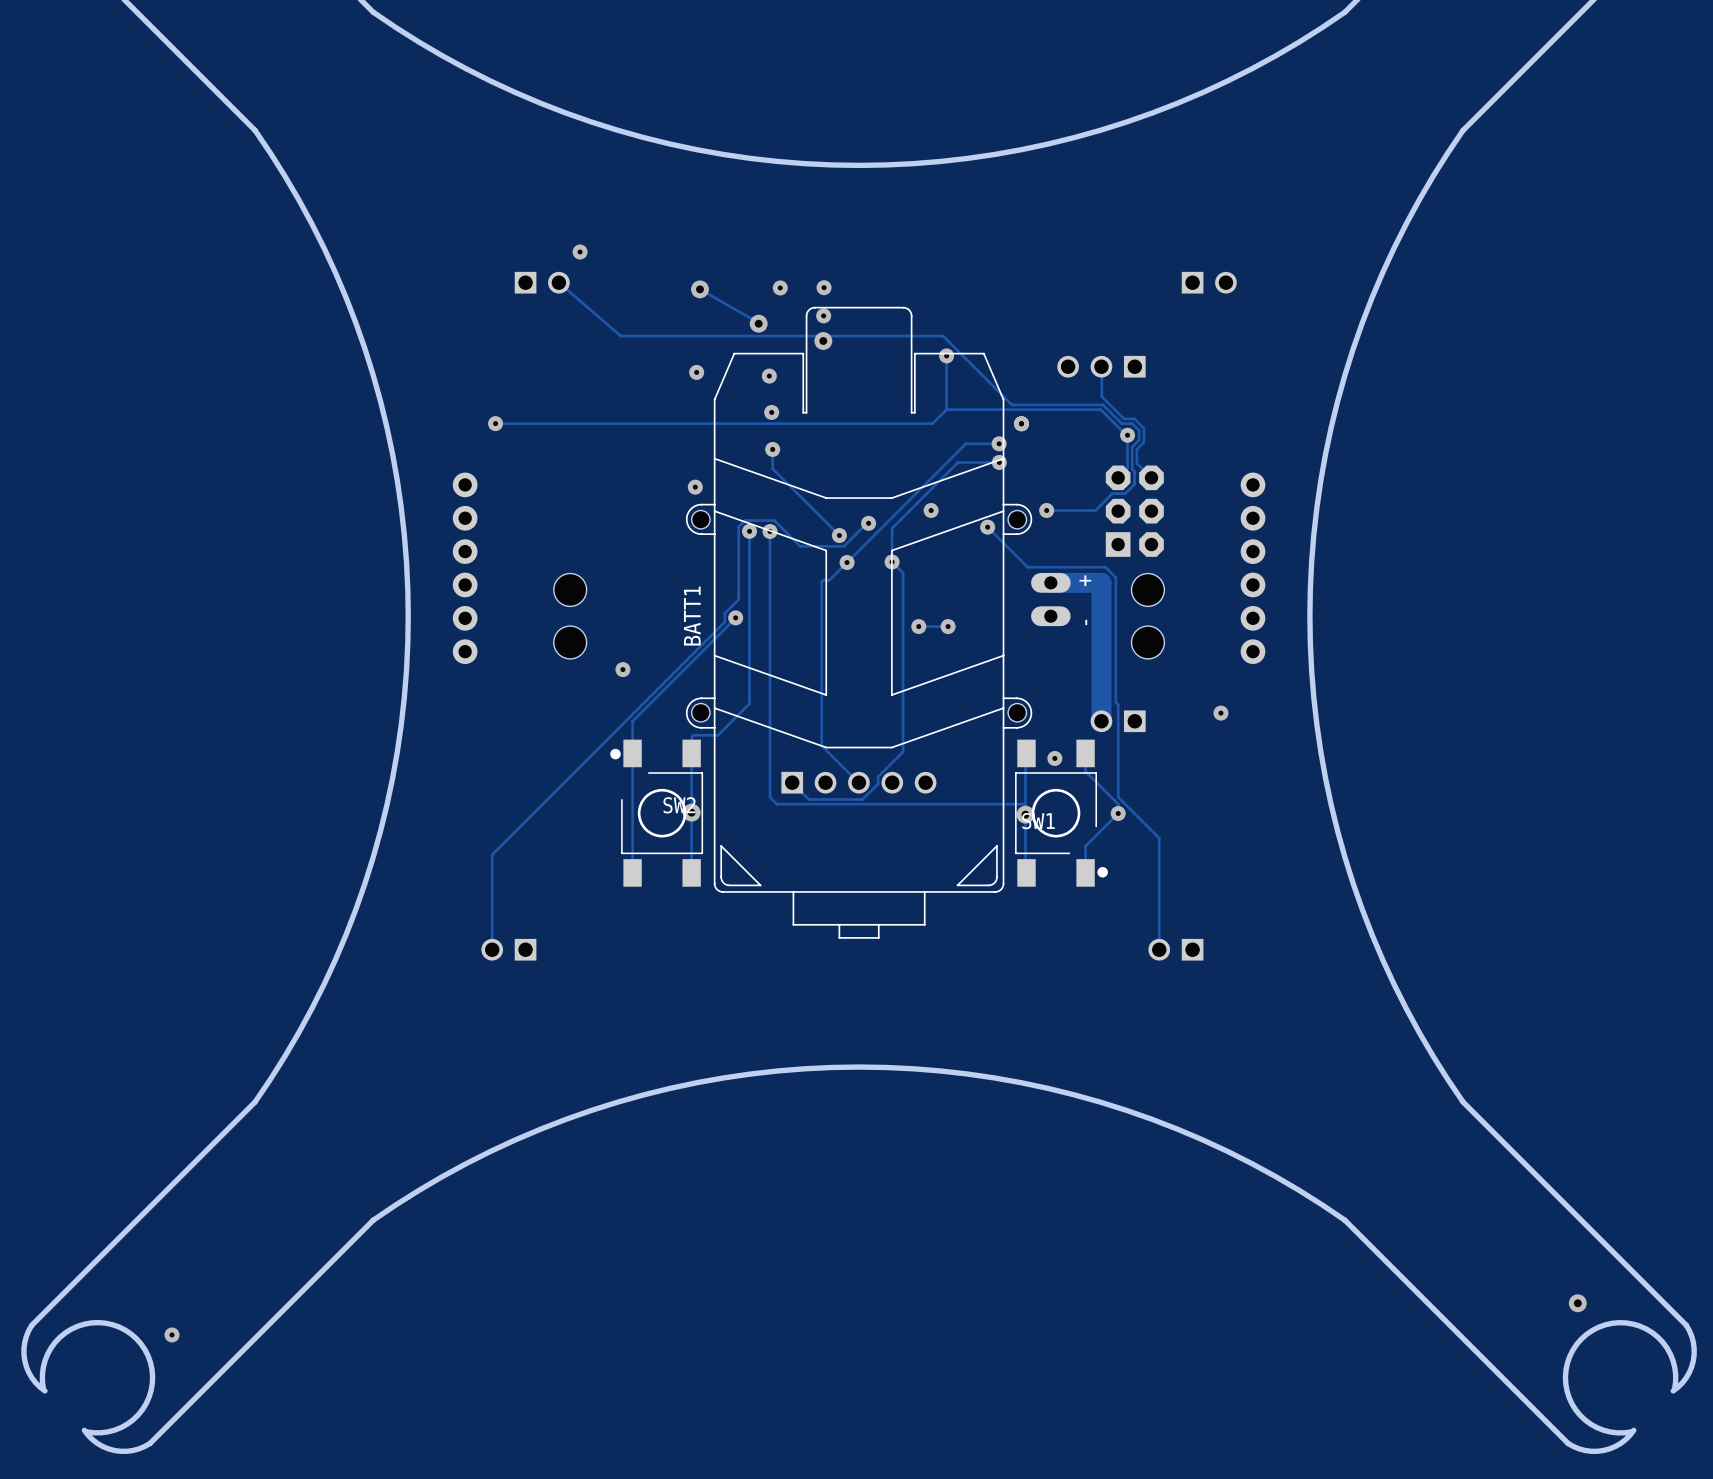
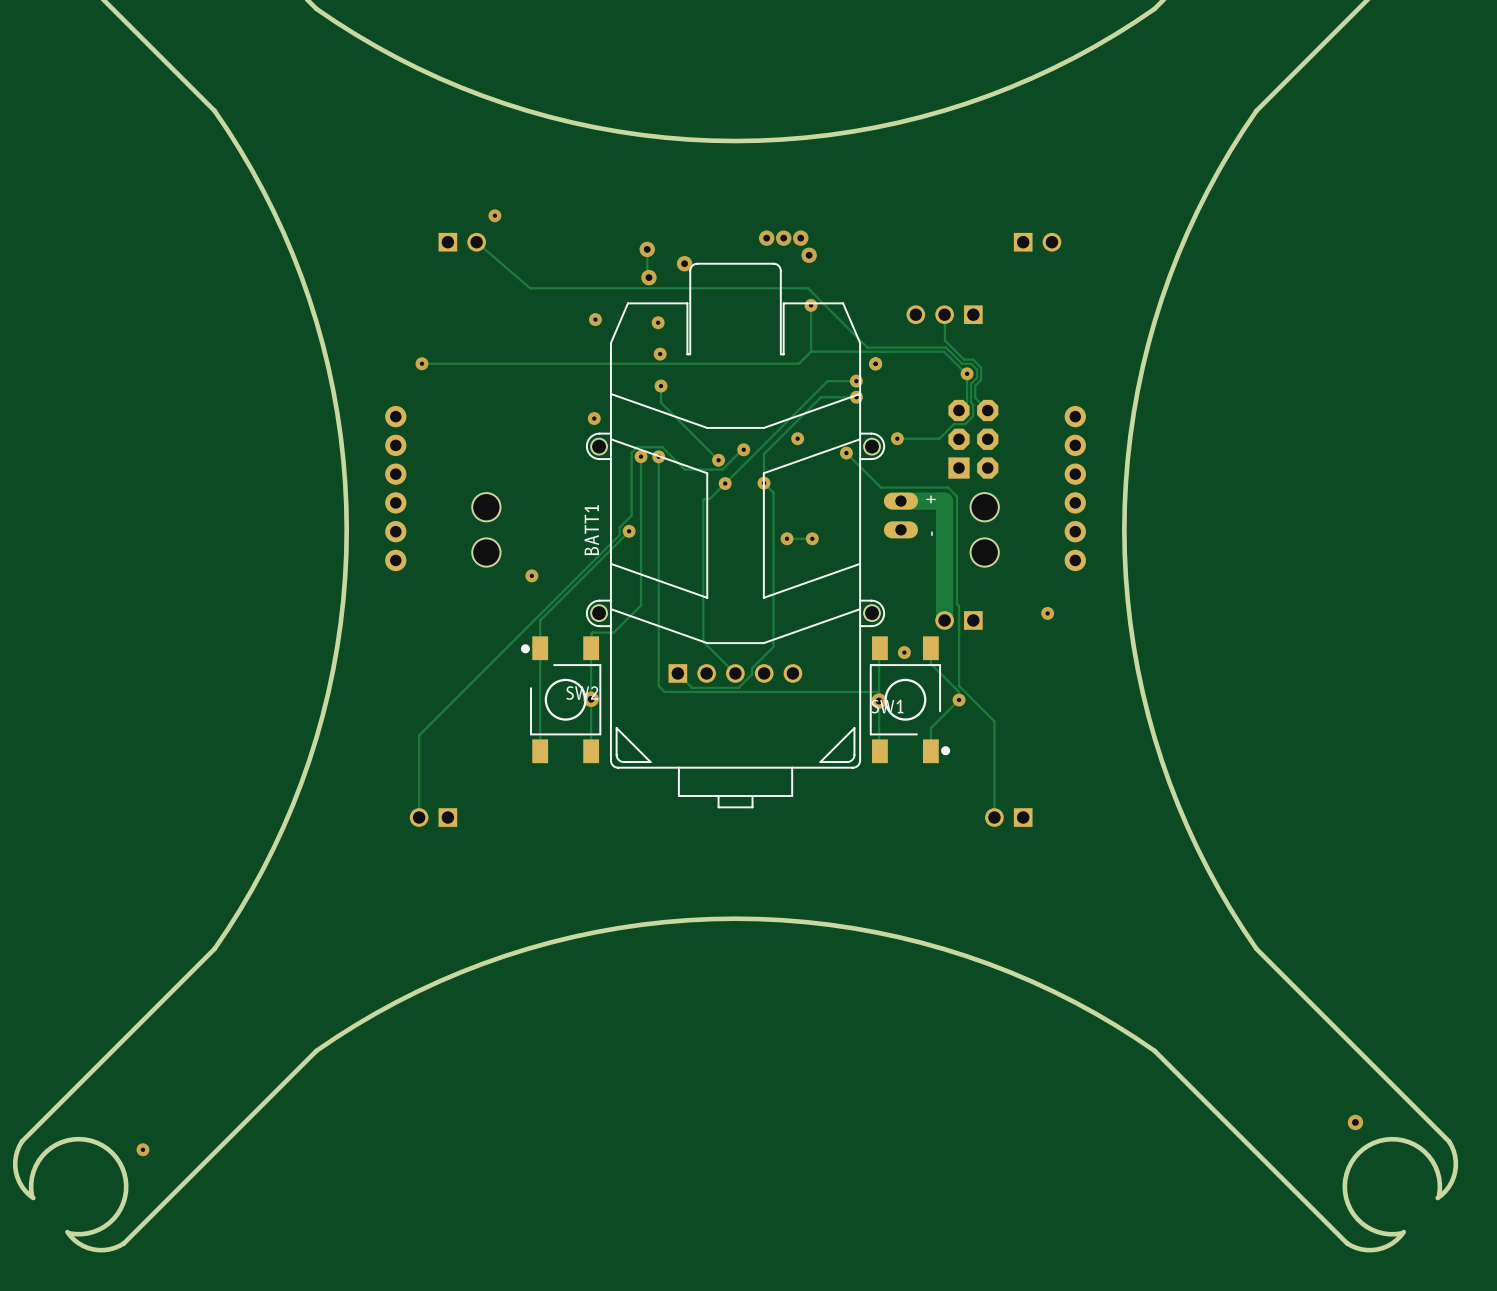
via: none -> (766, 238)
via: none -> (783, 238)
via: none -> (800, 238)
via: (780, 287) -> none
via: (824, 287) -> none
track: (699, 289) (756, 321) -> (647, 249) (647, 275)
via: (699, 289) -> none
via: none -> (647, 249)
via: none -> (809, 255)
via: (823, 315) -> none
via position: (823, 341) -> (684, 263)

